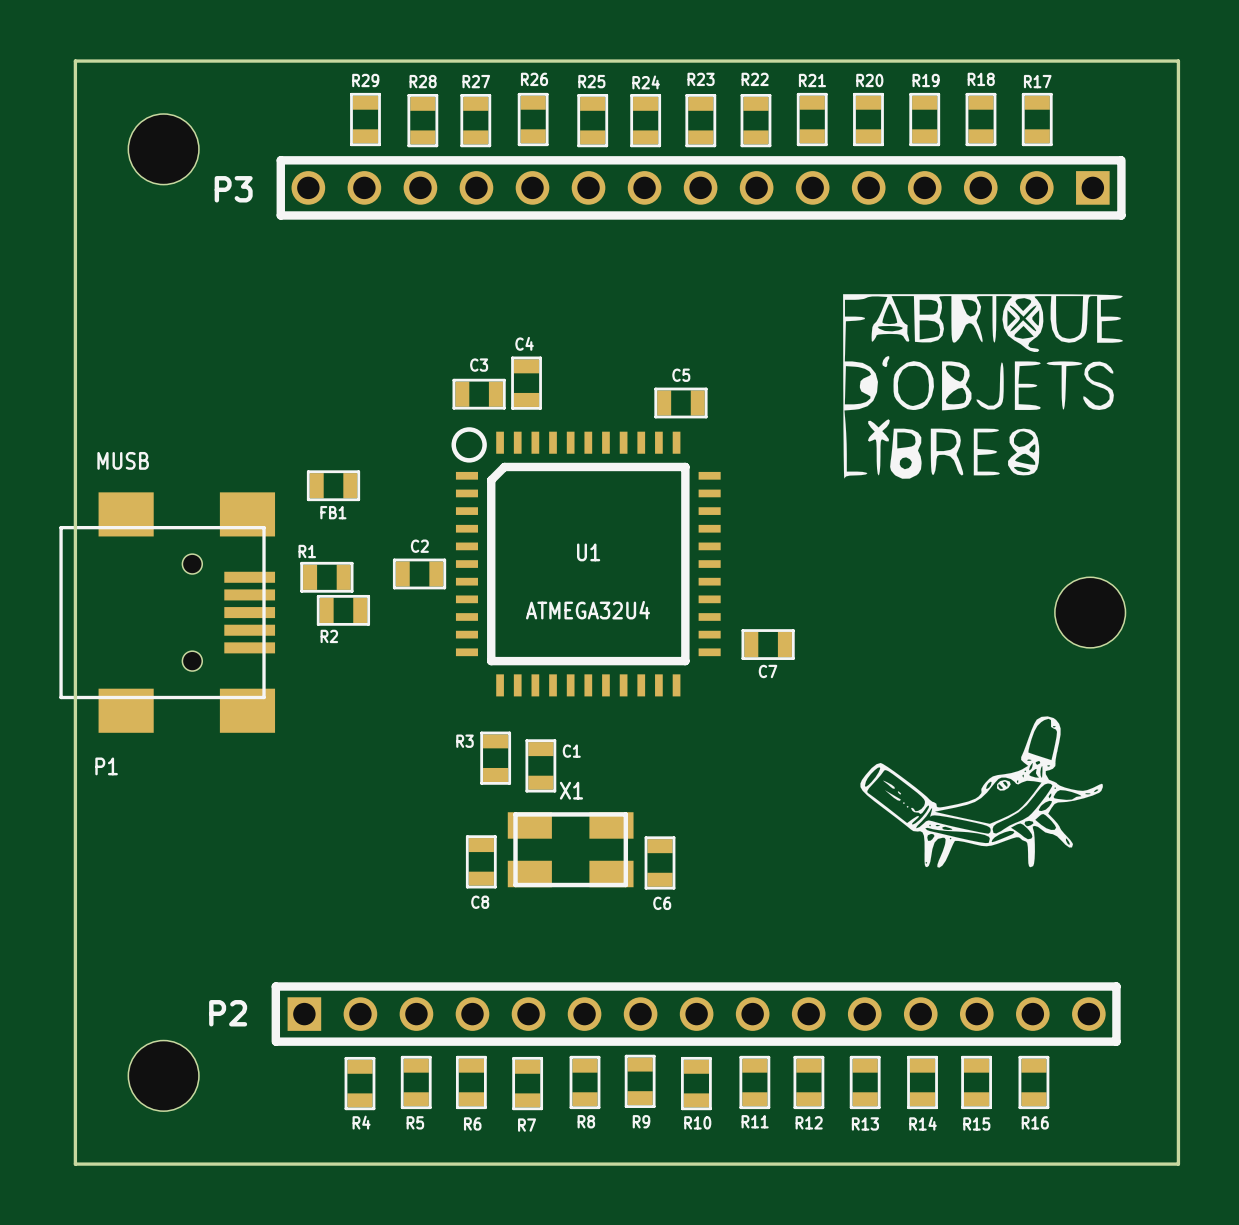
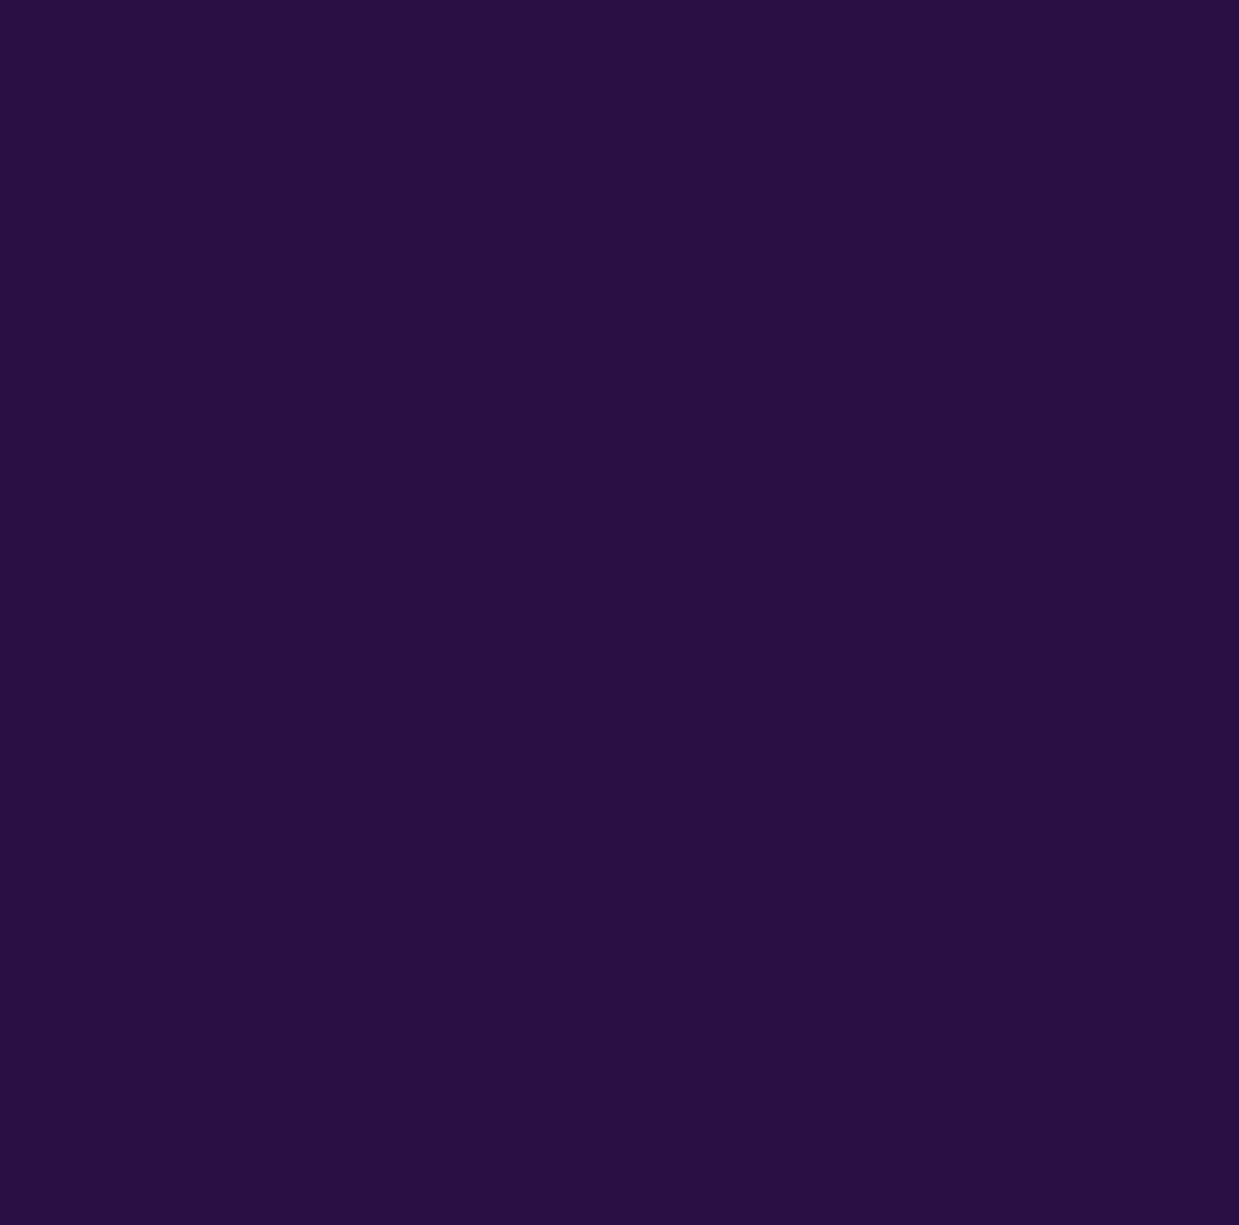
board edge: (75, 61) (75, 1164) (1178, 1164) (1178, 61) (75, 61) -> none
R29: (365, 119) -> none
R26: (533, 119) -> none
R21: (812, 119) -> none
R20: (868, 119) -> none
R19: (924, 119) -> none
R18: (980, 119) -> none
R17: (1037, 119) -> none
R28: (422, 120) -> none
R27: (475, 120) -> none
R25: (592, 120) -> none
R24: (645, 120) -> none
R23: (700, 120) -> none
R22: (755, 120) -> none
part: (163, 149) -> none
P3: (701, 187) -> none
drawing: [843, 294, 1123, 479] -> none
C4: (526, 383) -> none
C3: (479, 394) -> none
C5: (680, 402) -> none
FB1: (333, 485) -> none
U1: ATMEGA32U4 (586, 561) -> none
C2: (419, 573) -> none
R1: (326, 577) -> none
R2: (343, 610) -> none
P1: MUSB (167, 612) -> none
part: (1090, 612) -> none
C7: (768, 644) -> none
drawing: [860, 716, 1103, 868] -> none
R3: (495, 758) -> none
C1: (540, 765) -> none
X1: (570, 849) -> none
C8: (481, 861) -> none
C6: (660, 862) -> none
P2: (696, 1014) -> none
part: (163, 1075) -> none
R9: (640, 1081) -> none
R5: (416, 1082) -> none
R6: (471, 1082) -> none
R8: (585, 1082) -> none
R11: (754, 1082) -> none
R12: (808, 1082) -> none
R13: (865, 1082) -> none
R14: (922, 1082) -> none
R15: (976, 1082) -> none
R16: (1033, 1082) -> none
R4: (359, 1083) -> none
R7: (527, 1083) -> none
R10: (696, 1083) -> none

